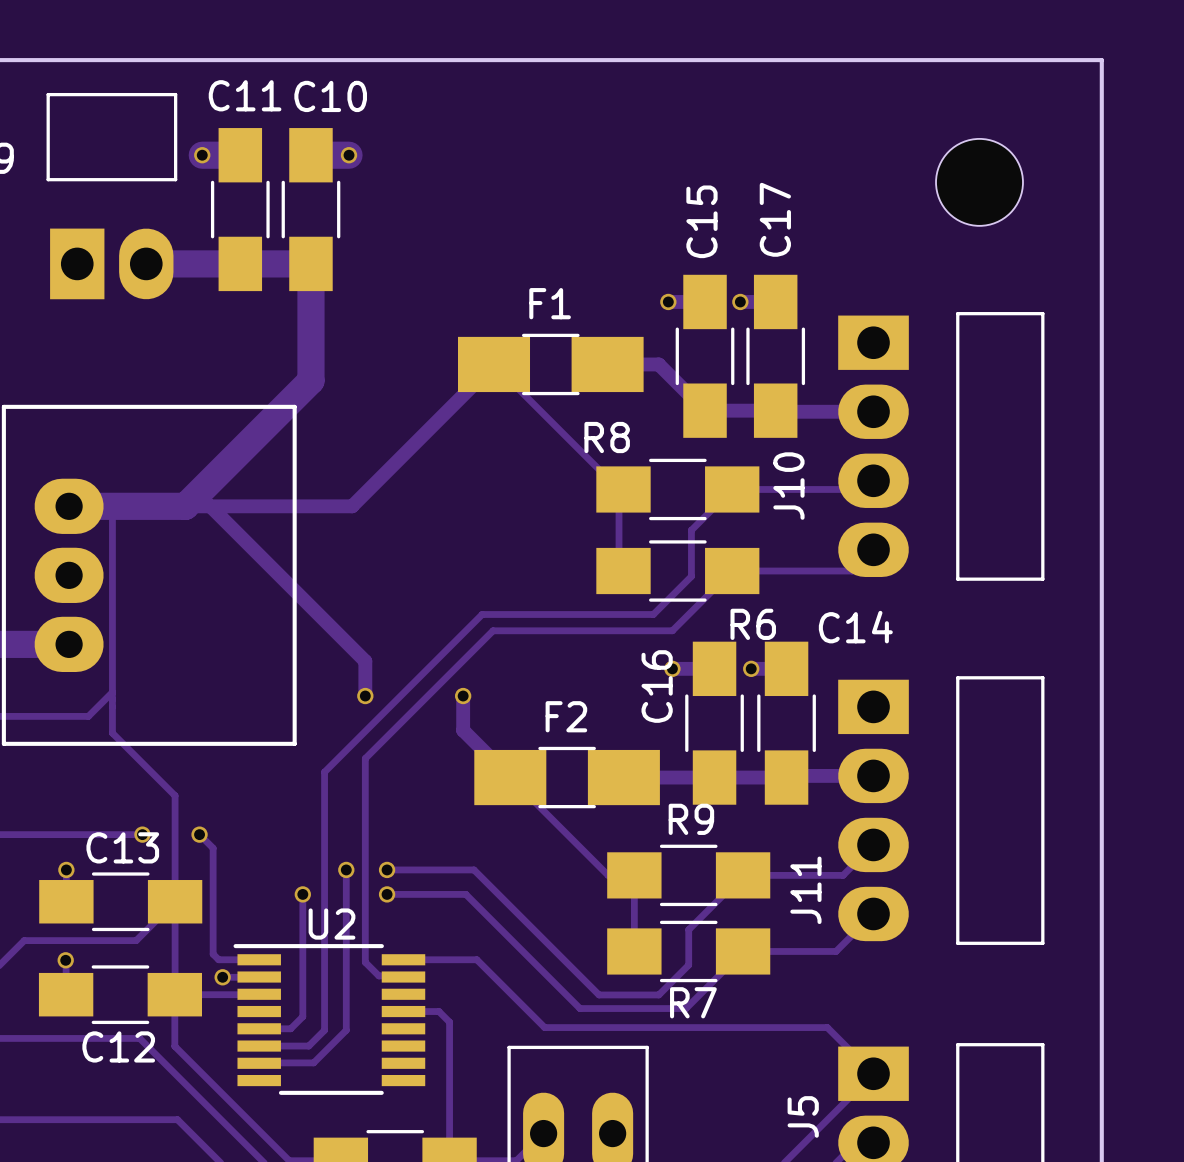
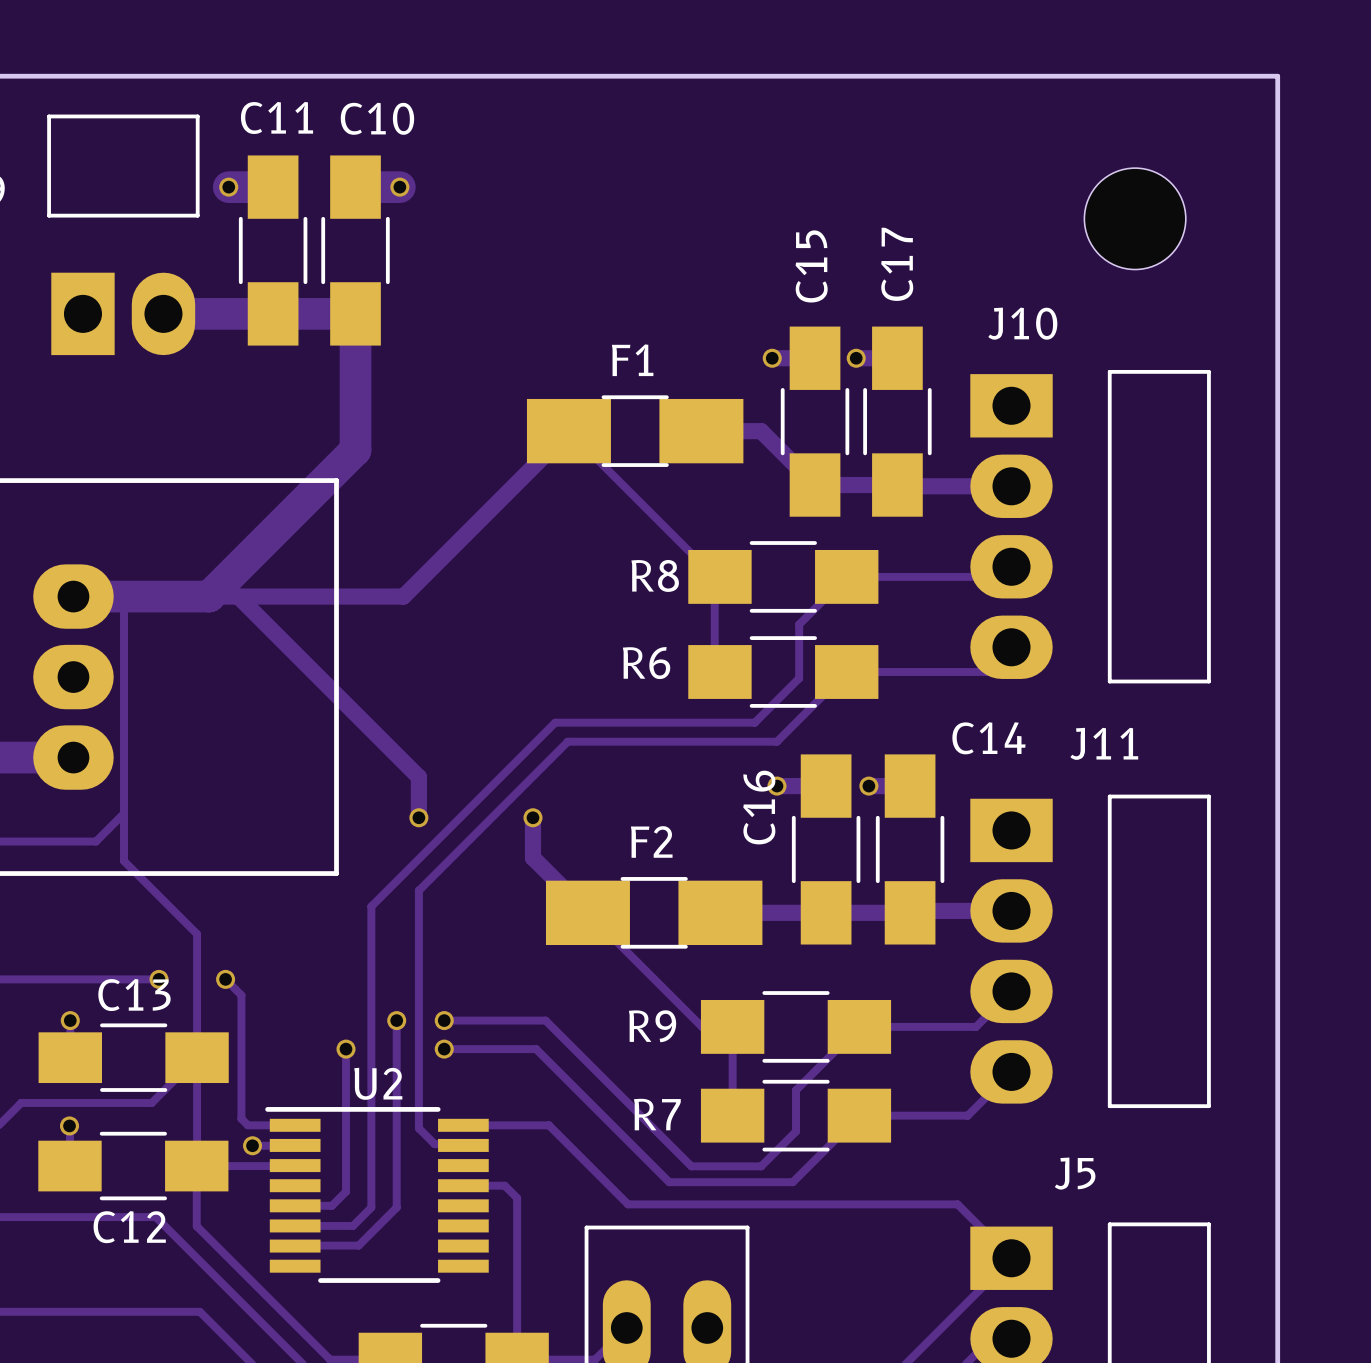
R8 name position: R8 (607, 437) -> R8 (655, 575)
J10 name rotation: 0° (788, 486) -> 90° clockwise (1022, 323)
J10 name position: J10 (788, 486) -> J10 (1022, 323)
R6 name position: R6 (753, 624) -> R6 (646, 663)
R9 name position: R9 (691, 819) -> R9 (652, 1026)
J11 name rotation: 0° (805, 890) -> 90° clockwise (1104, 743)
J11 name position: J11 (805, 890) -> J11 (1104, 743)
R7 name position: R7 (693, 1002) -> R7 (657, 1114)
J5 name rotation: 0° (803, 1116) -> 90° clockwise (1075, 1173)
J5 name position: J5 (803, 1116) -> J5 (1075, 1173)

